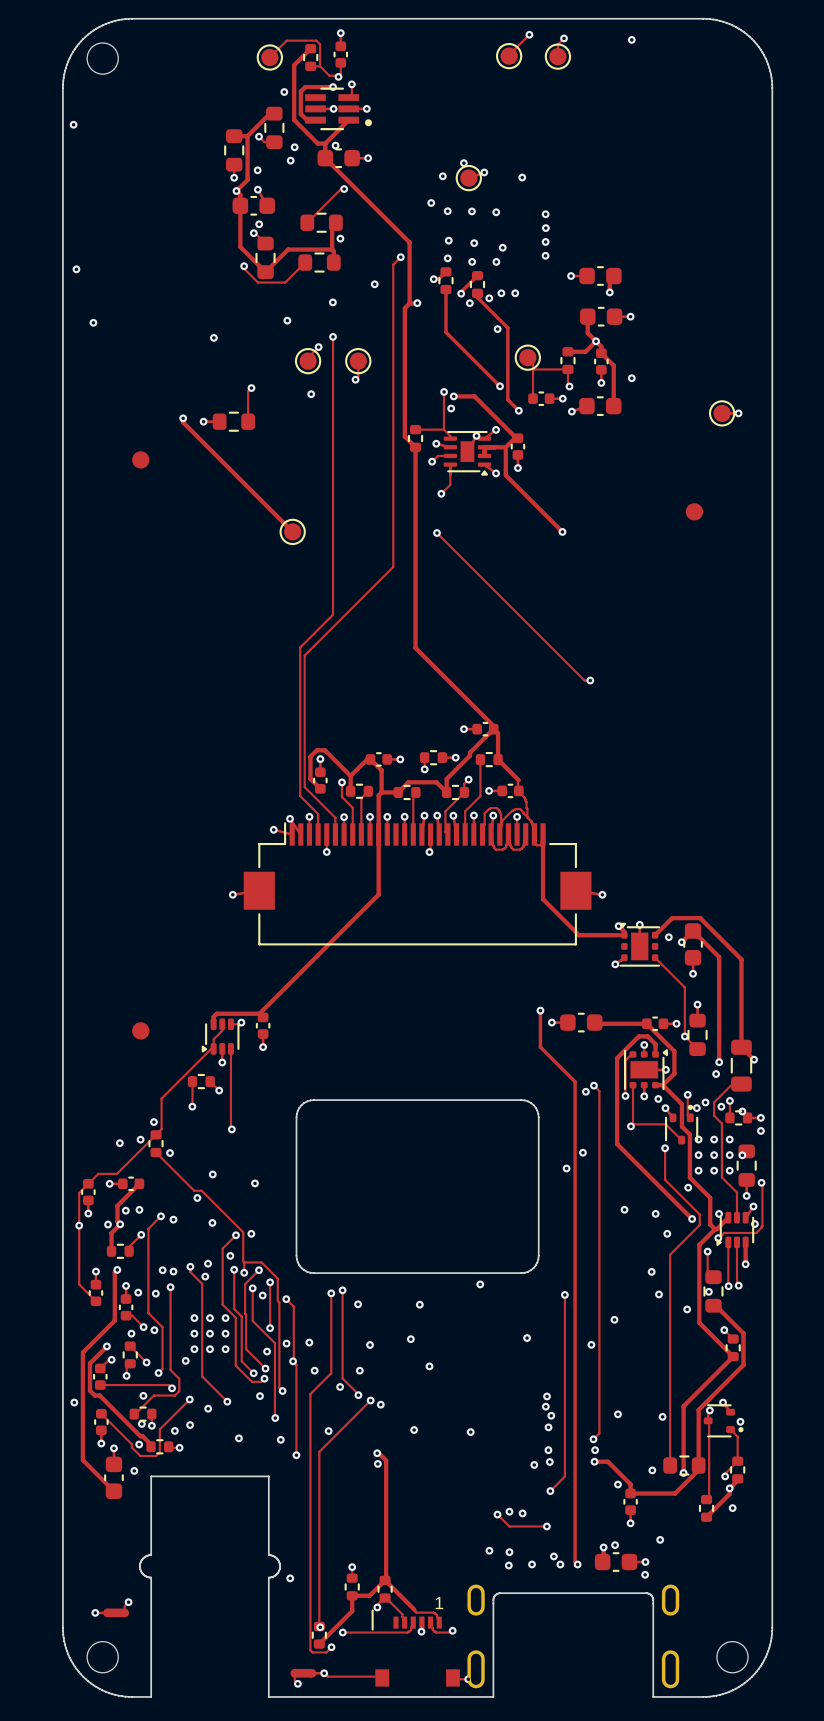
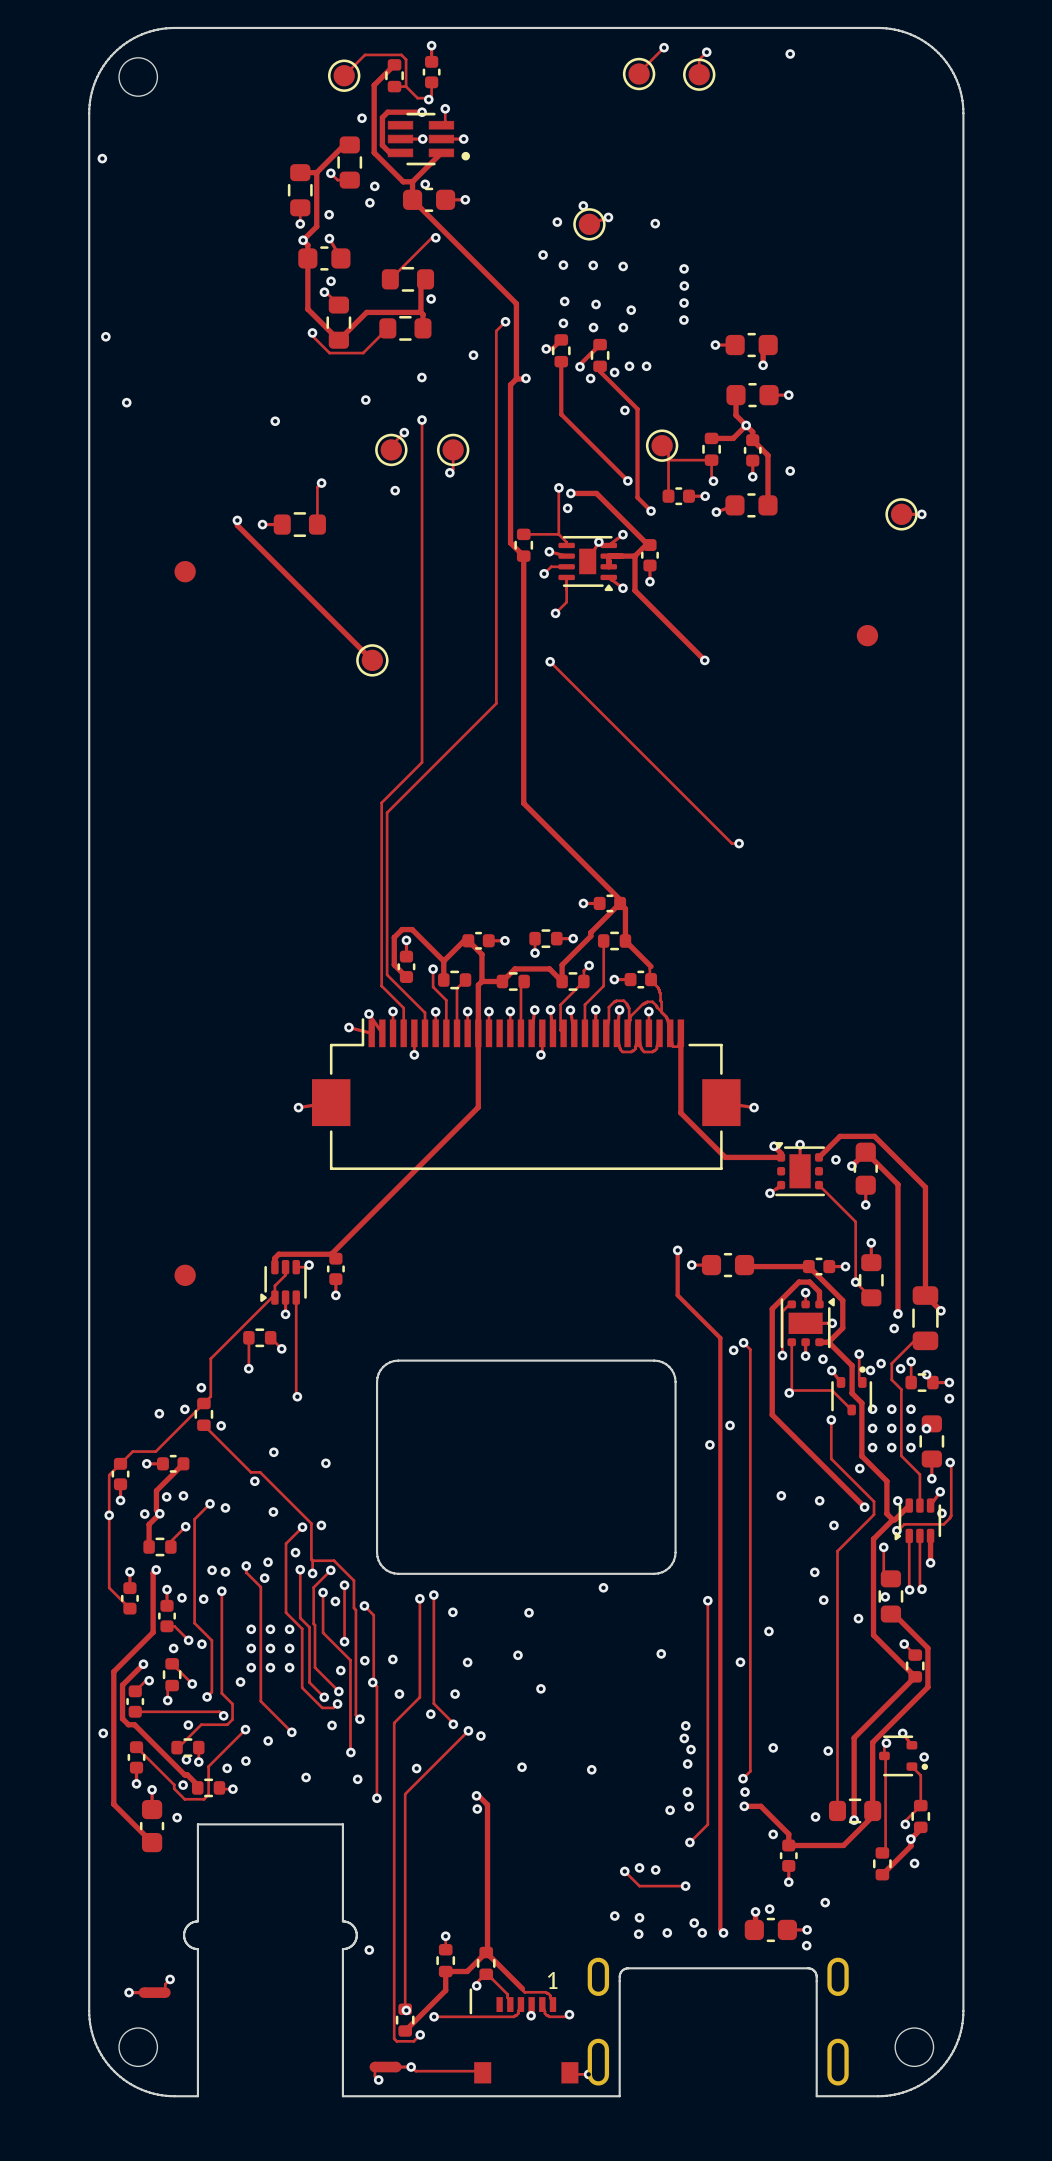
part footprint: [371, 1609, 460, 1687] -> [469, 1988, 579, 2084]

